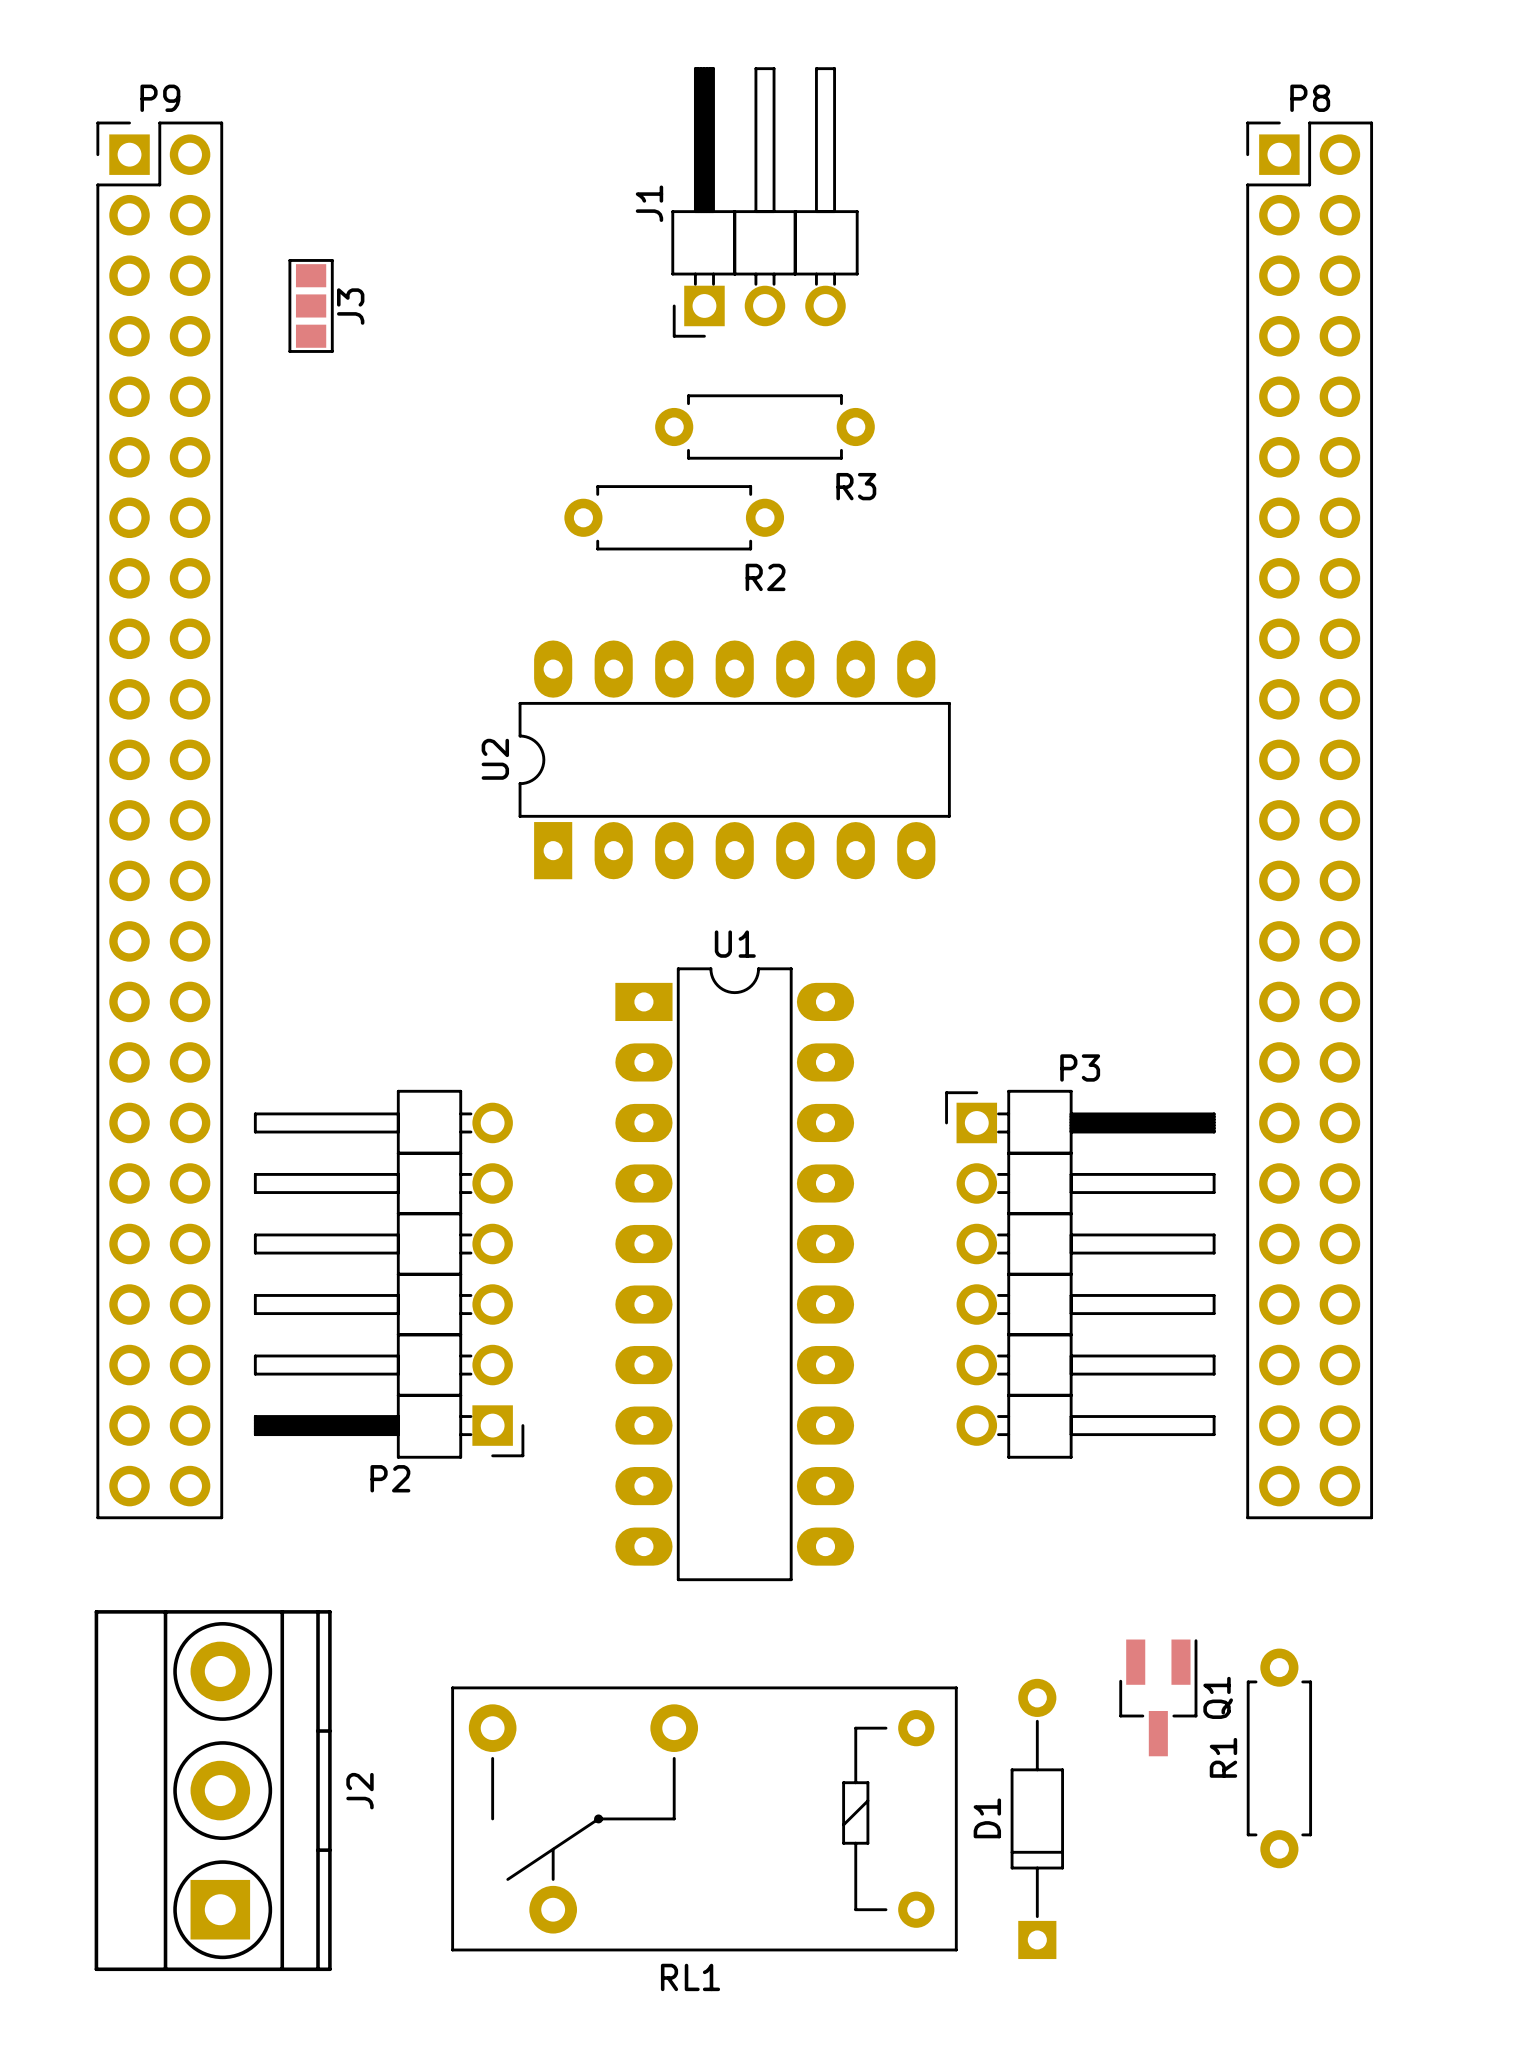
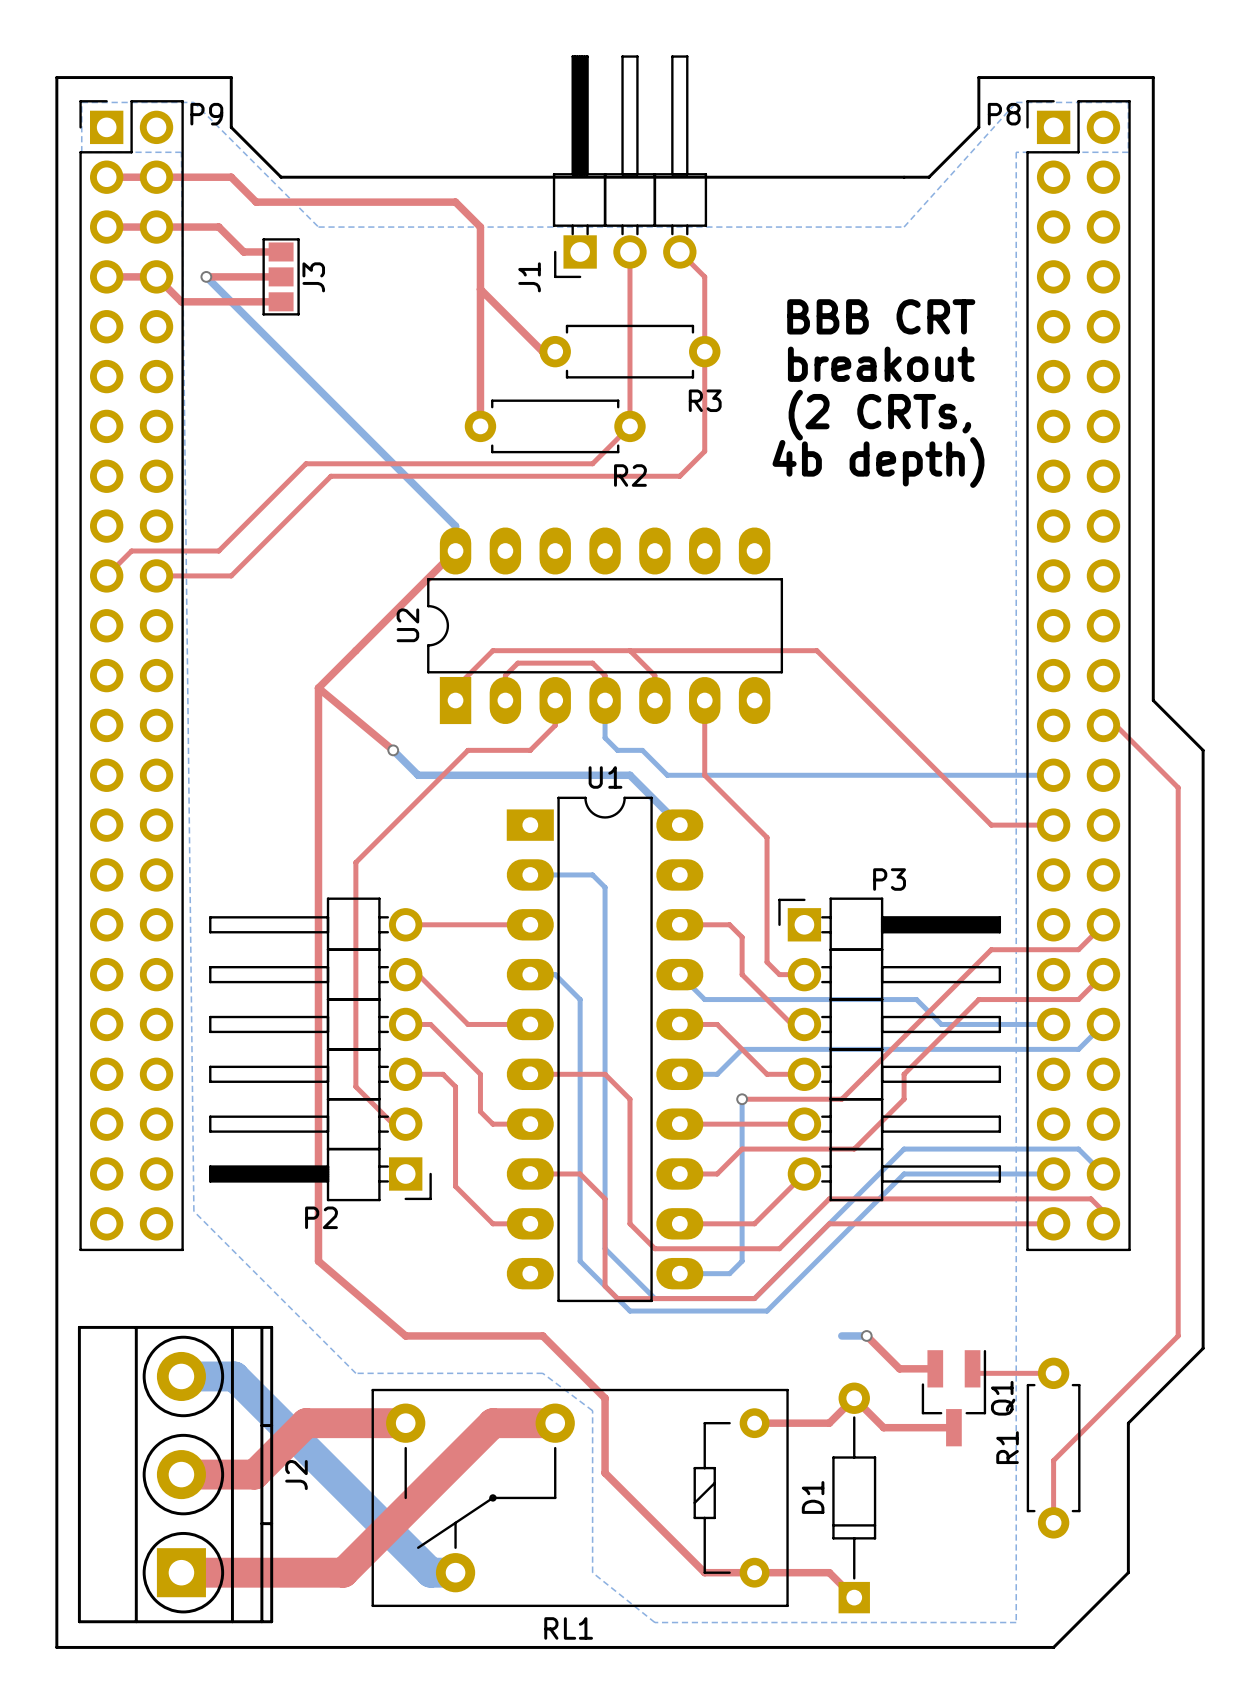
board edge: none -> (56, 77) (56, 1647) (1053, 1647) (1128, 1572) (1128, 1423) (1203, 1348) (1203, 750) (1153, 700) (1153, 77) (978, 77) (978, 127) (929, 177) (281, 177) (231, 127) (231, 77) (56, 77)
P9 name position: P9 (160, 98) -> P9 (206, 114)
P8 name position: P8 (1310, 98) -> P8 (1004, 114)
bottom zone outline: none -> (81, 102) (193, 102) (318, 227) (904, 227) (1016, 102) (1128, 102) (1128, 152) (1016, 152) (1016, 1622) (654, 1622) (592, 1572) (592, 1410) (542, 1373) (355, 1373) (193, 1211) (181, 152) (81, 152) (81, 102)
J1 name position: J1 (649, 203) -> J1 (529, 277)
top track: none -> (106, 177) (231, 177) (256, 202) (455, 202) (480, 227) (480, 426)
top track: none -> (106, 227) (218, 227) (243, 251) (281, 251)
J3 position: (311, 305) -> (281, 276)
top track: none -> (629, 251) (629, 426) (592, 463) (306, 463) (218, 551) (131, 551) (106, 575)
top track: none -> (679, 251) (704, 276) (704, 451) (679, 476) (330, 476) (231, 575) (156, 575)
top track: none -> (106, 276) (156, 276) (181, 301) (281, 301)
top track: none -> (206, 276) (281, 276)
bottom track: none -> (206, 276) (455, 526) (455, 551)
via: none -> (206, 276)
top track: none -> (480, 289) (542, 351) (555, 351)
text: none -> BBB CRT (881, 316)
text: none -> breakout (881, 364)
text: none -> (2 CRTs, (879, 415)
text: none -> 4b depth) (878, 462)
top track: none -> (455, 551) (318, 688)
top track: none -> (629, 650) (654, 675) (654, 700)
top track: none -> (318, 688) (393, 750)
top track: none -> (318, 688) (318, 1261) (405, 1335) (542, 1335) (605, 1398) (605, 1473) (704, 1572) (829, 1572) (854, 1597)
top track: none -> (455, 700) (455, 688) (492, 650) (816, 650) (991, 825) (1053, 825)
top track: none -> (505, 700) (505, 675) (517, 663) (592, 663) (605, 675) (605, 700)
top track: none -> (555, 700) (555, 725) (530, 750) (468, 750) (355, 862) (355, 1086) (393, 1124) (405, 1124)
bottom track: none -> (605, 700) (605, 737) (617, 750) (642, 750) (667, 775) (1053, 775)
top track: none -> (704, 700) (704, 775) (767, 837) (767, 962) (779, 974) (804, 974)
top track: none -> (1103, 725) (1115, 725) (1178, 787) (1178, 1335) (1053, 1460) (1053, 1522)
bottom track: none -> (393, 750) (418, 775) (629, 775) (679, 825)
via: none -> (393, 750)
bottom track: none -> (530, 874) (592, 874) (605, 887) (605, 1248) (654, 1298) (754, 1298) (904, 1149) (1078, 1149) (1103, 1173)
top track: none -> (405, 924) (530, 924)
top track: none -> (679, 924) (729, 924) (742, 937) (742, 974) (791, 1024) (804, 1024)
top track: none -> (1103, 924) (1078, 949) (991, 949) (841, 1099) (742, 1099)
top track: none -> (405, 974) (418, 974) (468, 1024) (530, 1024)
bottom track: none -> (530, 974) (555, 974) (580, 999) (580, 1261) (629, 1311) (767, 1311) (904, 1173) (1053, 1173)
bottom track: none -> (679, 974) (704, 999) (916, 999) (941, 1024) (1053, 1024)
top track: none -> (1103, 974) (1078, 999) (978, 999) (904, 1074) (904, 1099) (854, 1149) (742, 1149) (717, 1173) (679, 1173)
top track: none -> (405, 1024) (430, 1024) (480, 1074) (480, 1111) (492, 1124) (530, 1124)
top track: none -> (679, 1024) (717, 1024) (767, 1074) (804, 1074)
bottom track: none -> (1103, 1024) (1078, 1049) (742, 1049) (717, 1074) (679, 1074)
top track: none -> (405, 1074) (443, 1074) (455, 1086) (455, 1186) (492, 1223) (530, 1223)
top track: none -> (530, 1074) (605, 1074) (629, 1099) (629, 1223) (654, 1248) (779, 1248) (829, 1198) (1090, 1198) (1103, 1211) (1103, 1223)
bottom track: none -> (742, 1099) (742, 1261) (729, 1273) (679, 1273)
via: none -> (742, 1099)
top track: none -> (679, 1124) (804, 1124)
top track: none -> (530, 1173) (580, 1173) (605, 1198) (605, 1286) (617, 1298) (754, 1298) (829, 1223) (1053, 1223)
top track: none -> (804, 1173) (754, 1223) (679, 1223)
bottom track: none -> (841, 1335) (866, 1335)
top track: none -> (866, 1335) (899, 1368) (935, 1368)
via: none -> (866, 1335)
top track: none -> (972, 1368) (977, 1373) (1053, 1373)
bottom track: none -> (181, 1376) (234, 1376) (430, 1572) (455, 1572)
top track: none -> (405, 1423) (306, 1423) (254, 1474) (181, 1474)
top track: none -> (555, 1423) (492, 1423) (343, 1572) (181, 1572)
top track: none -> (754, 1423) (829, 1423) (854, 1398) (883, 1427) (953, 1427)

